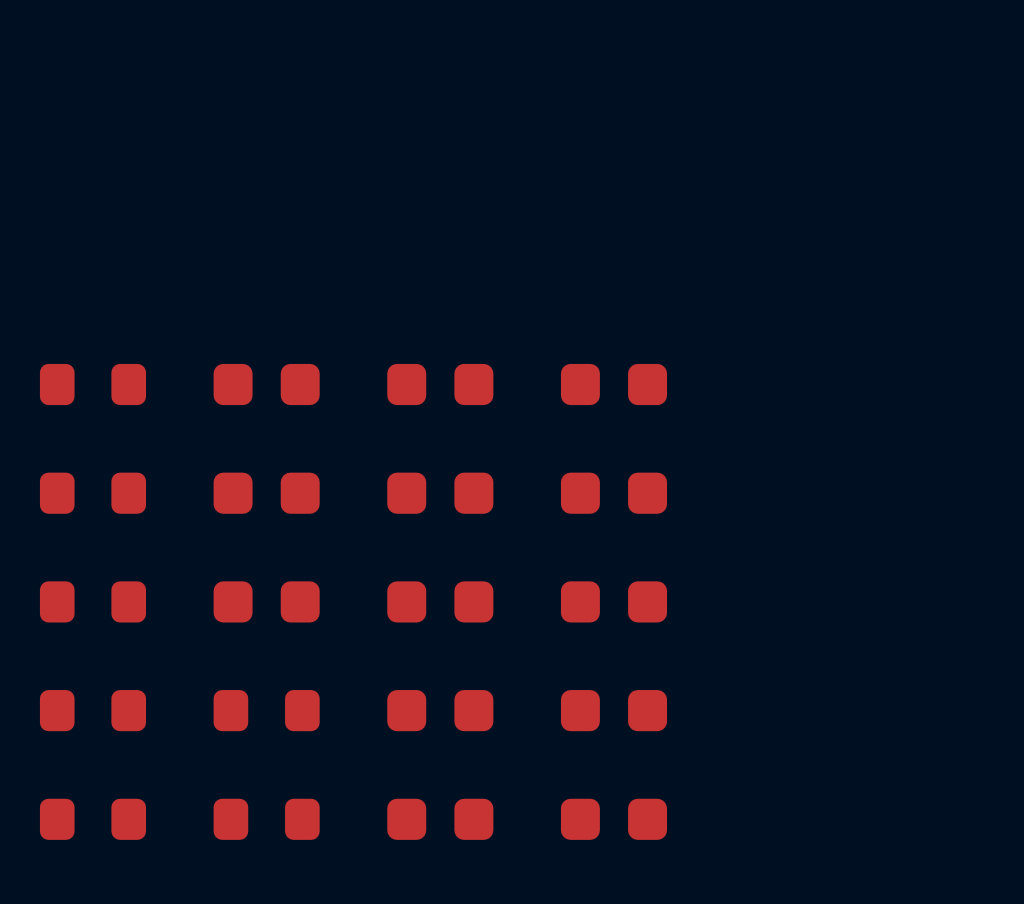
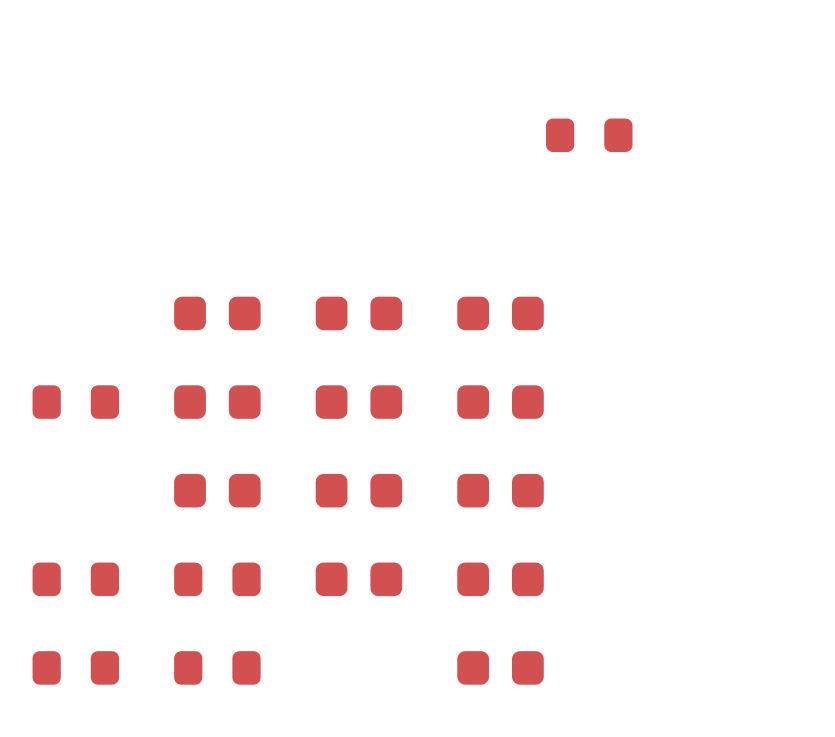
part: none -> (589, 135)
part: (92, 384) -> none
part: (92, 601) -> none
part: (440, 819) -> none

